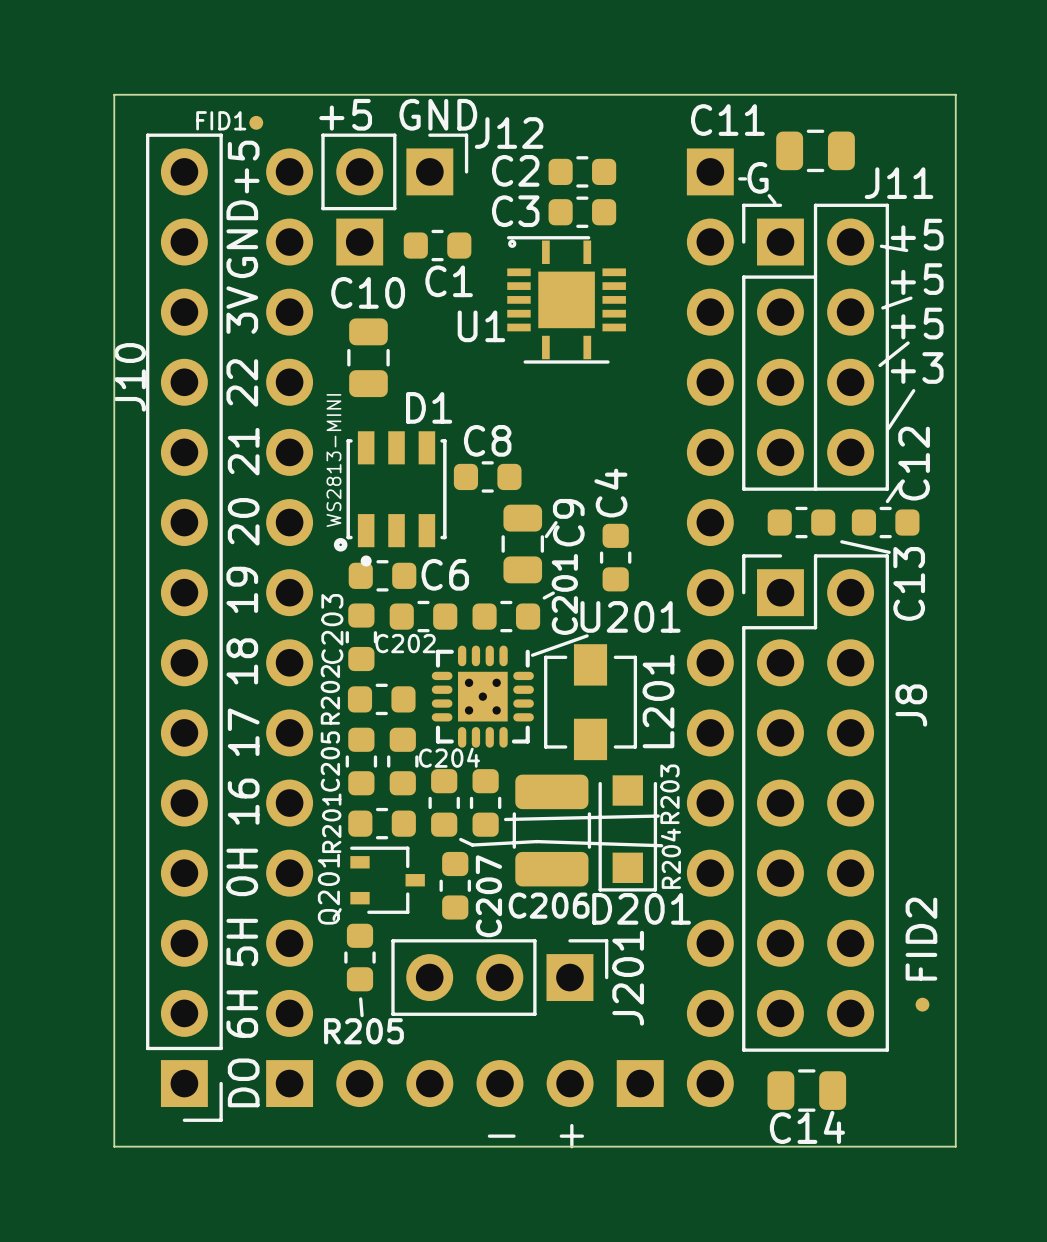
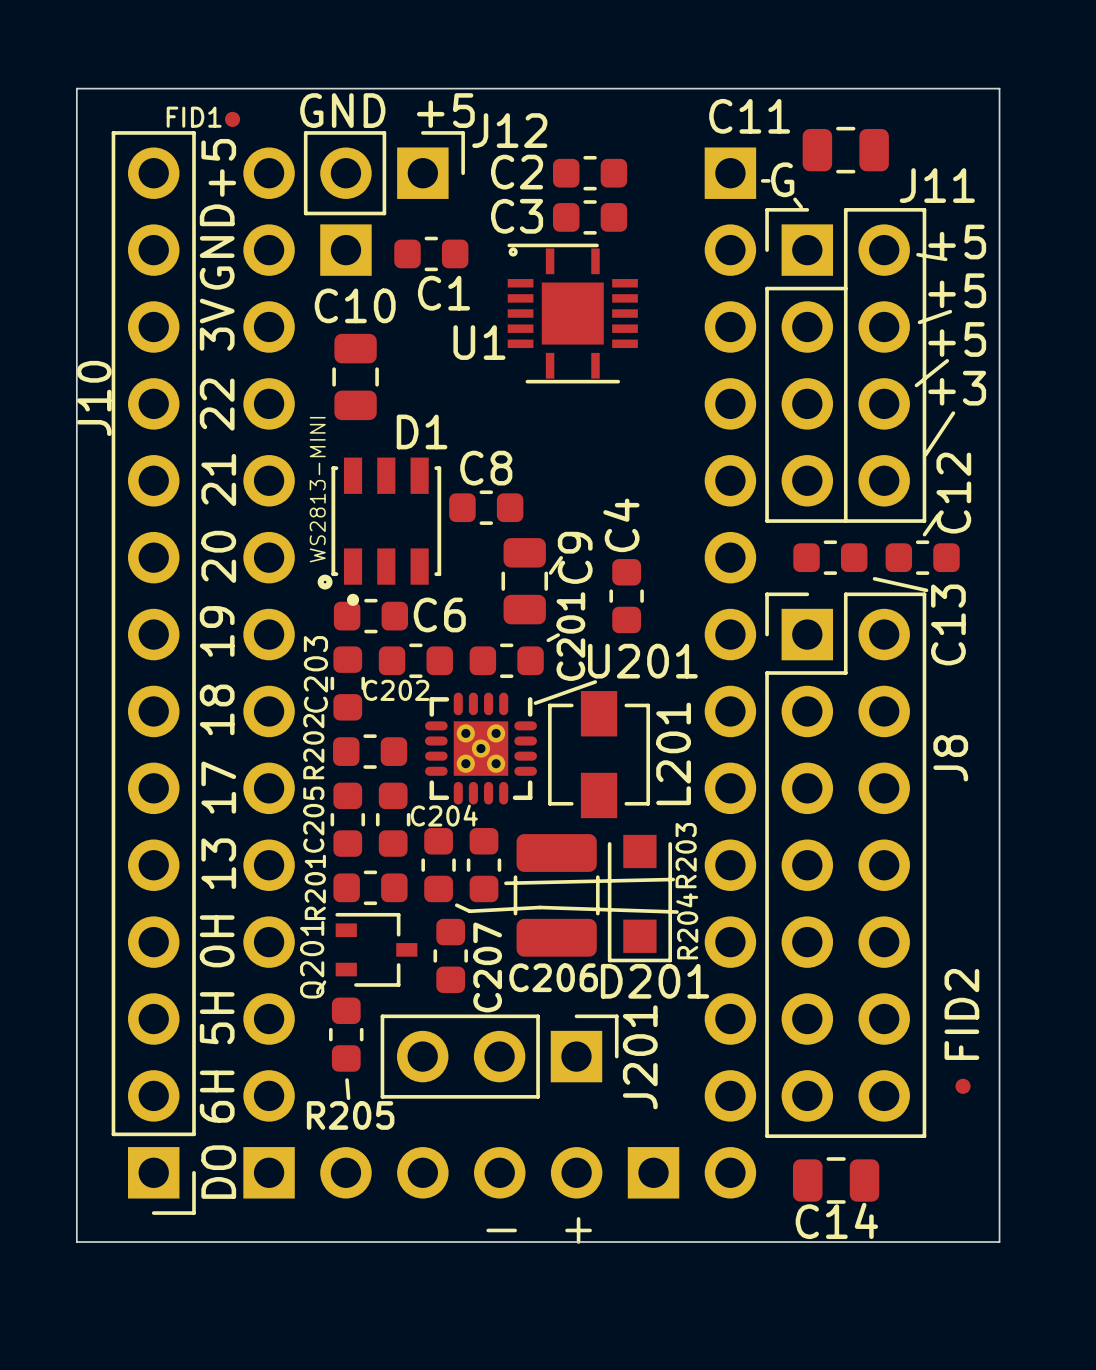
text: +5 GND (398, 114) -> GND +5 (387, 110)
text: 16 (243, 801) -> 13 (218, 863)

